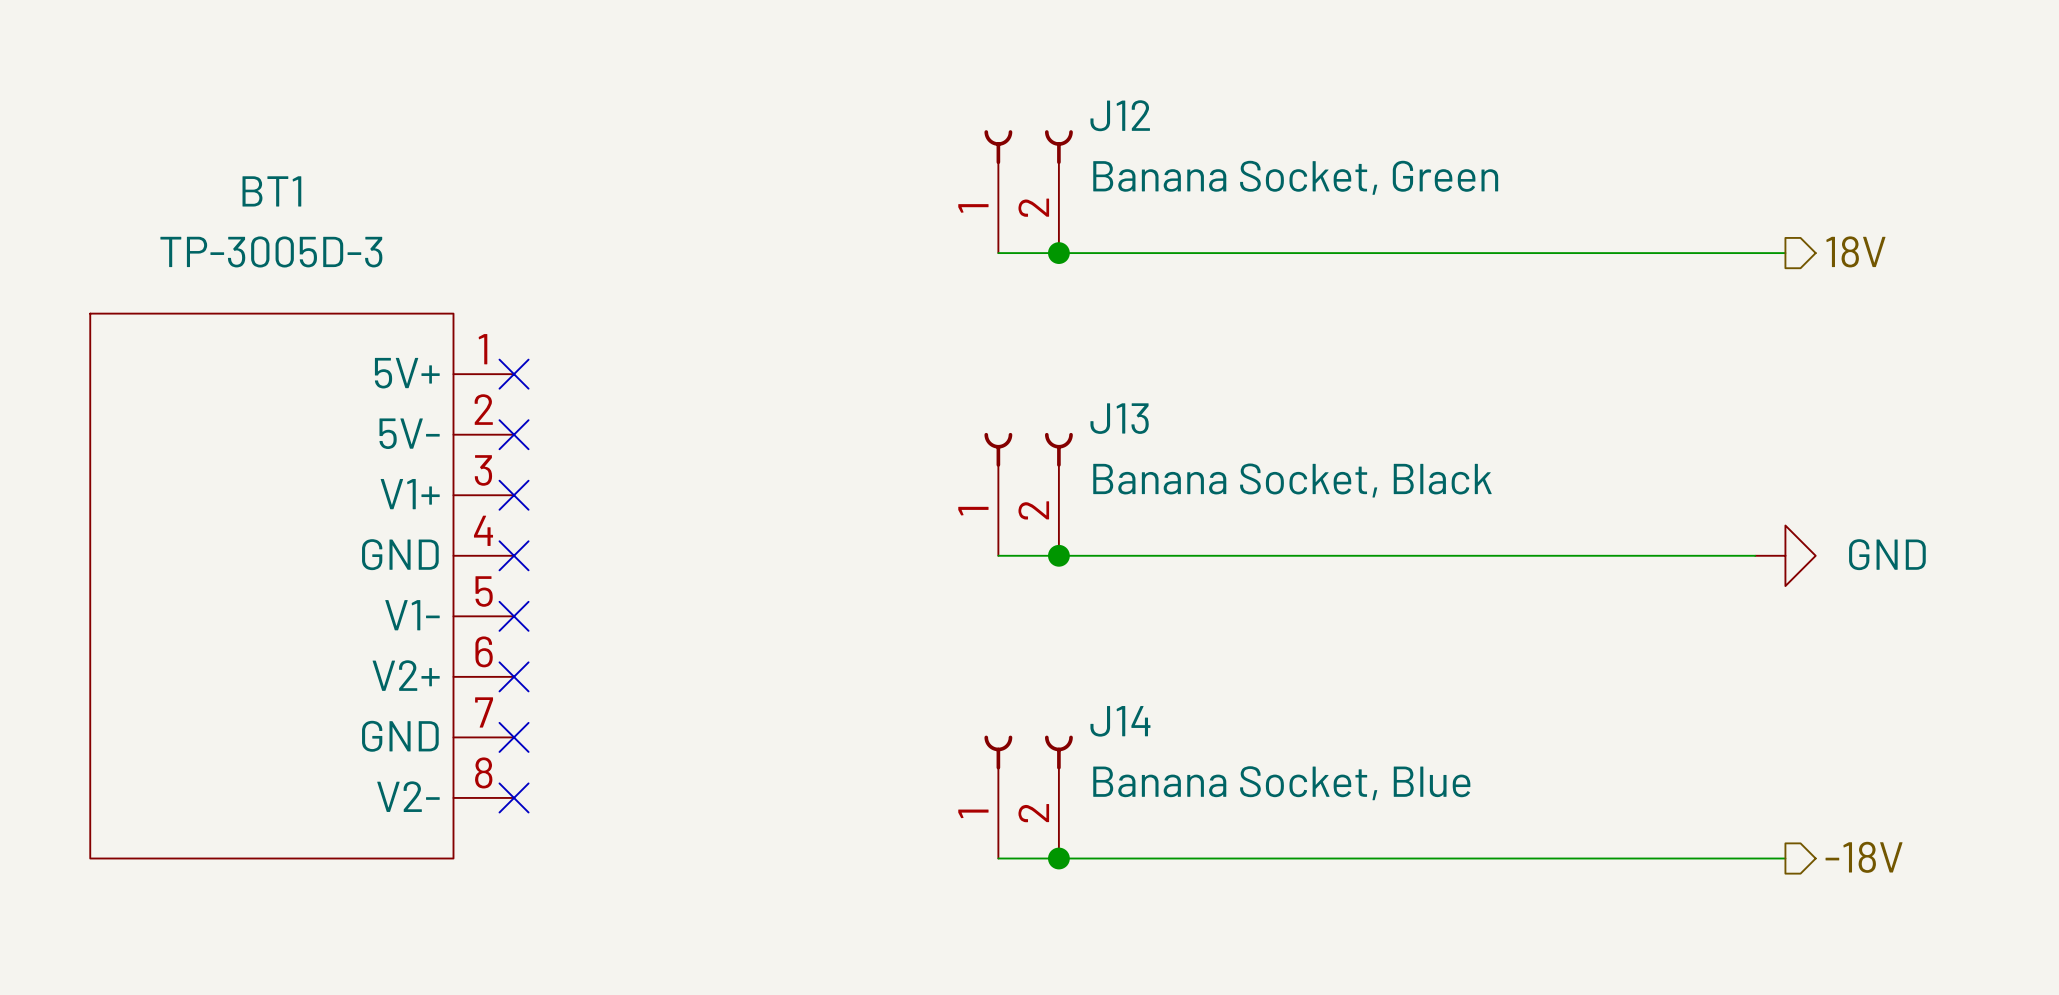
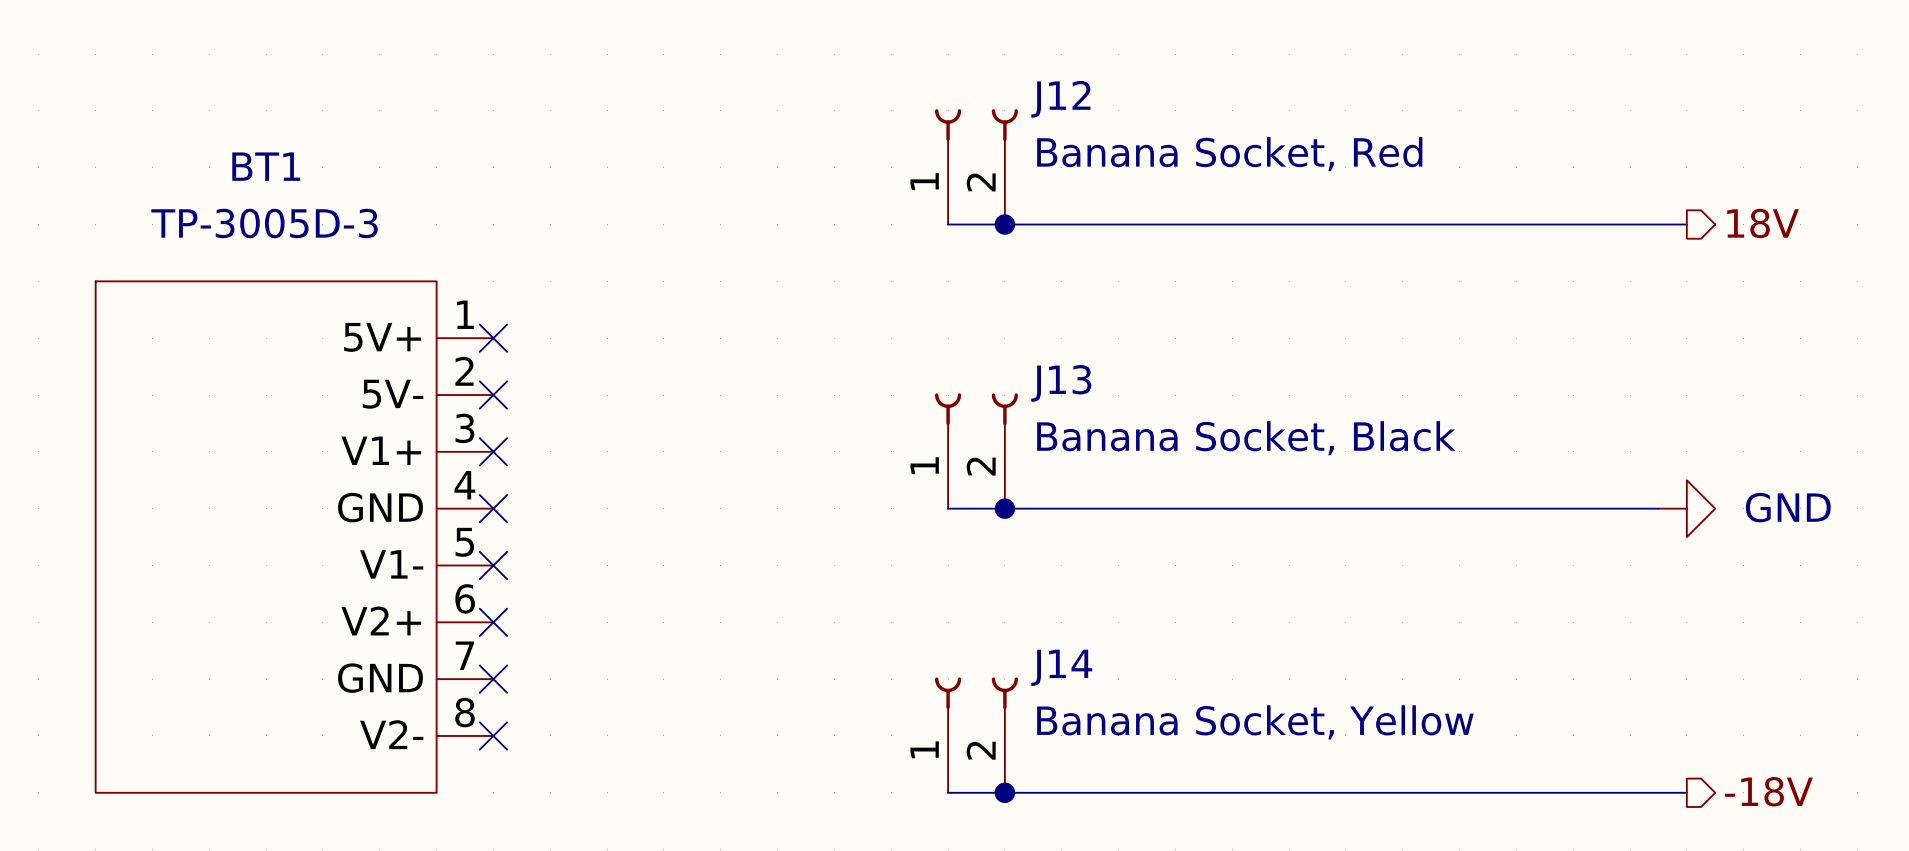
J12 value: Banana Socket, Green (1295, 177) -> Banana Socket, Red (1229, 154)
J14 value: Banana Socket, Blue (1281, 783) -> Banana Socket, Yellow (1255, 722)

